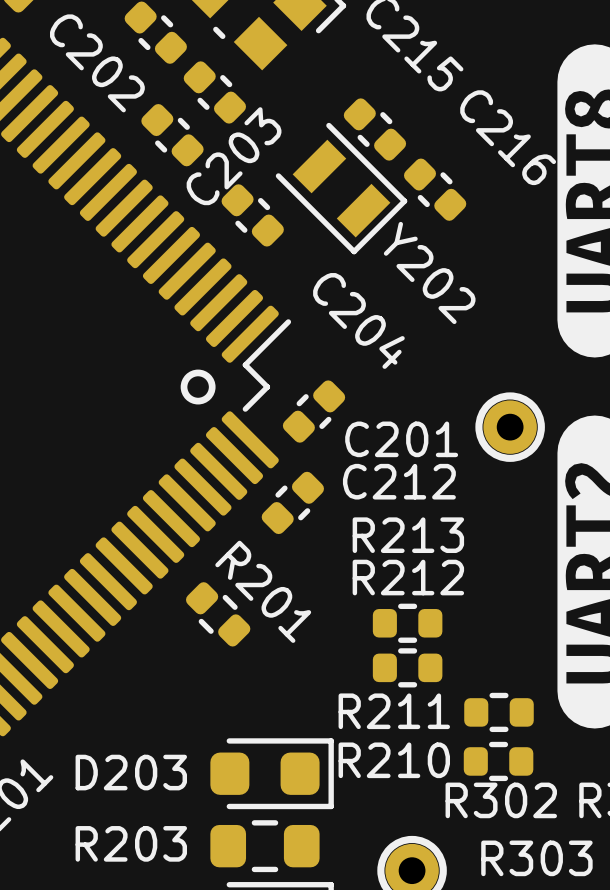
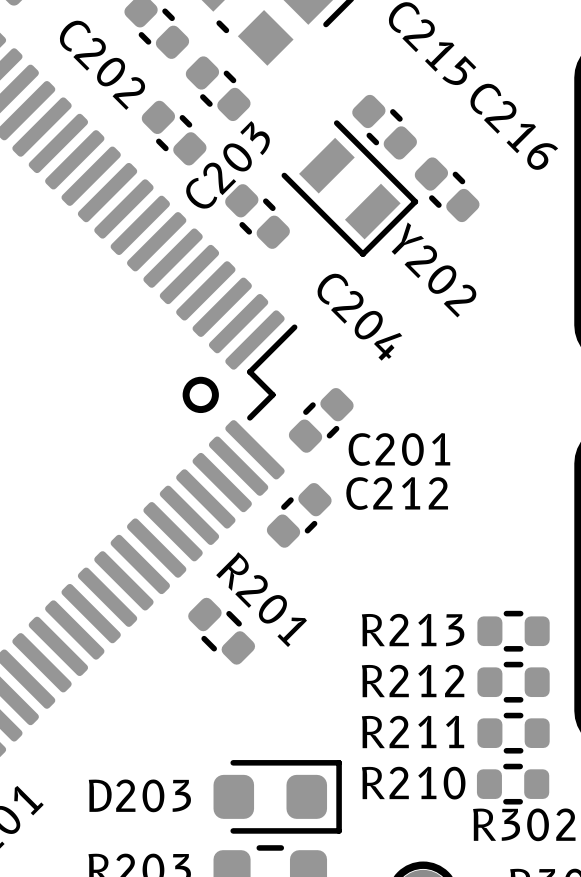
part: (510, 427) -> none
R213 name position: R213 (408, 535) -> R213 (413, 630)
R212 name position: R212 (408, 577) -> R212 (413, 680)
R213 position: (407, 623) -> (513, 631)
R212 position: (407, 667) -> (513, 682)

